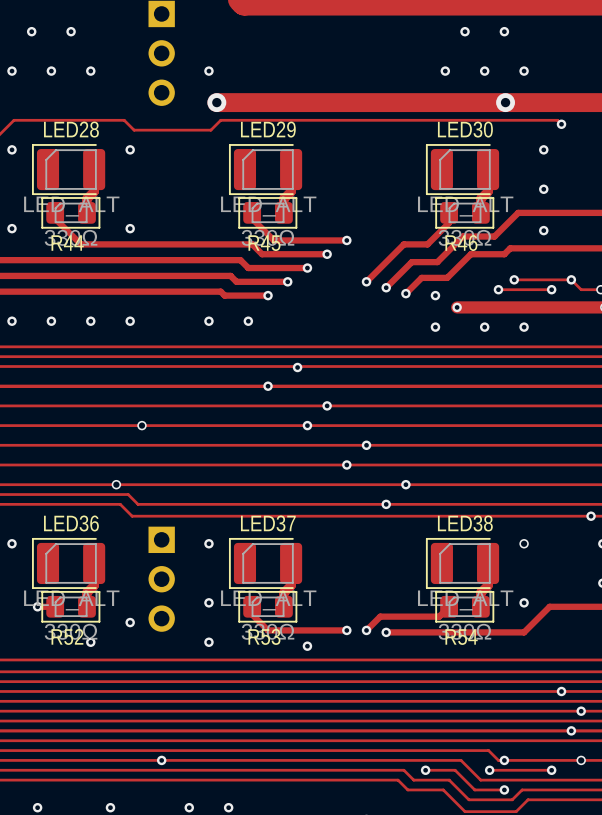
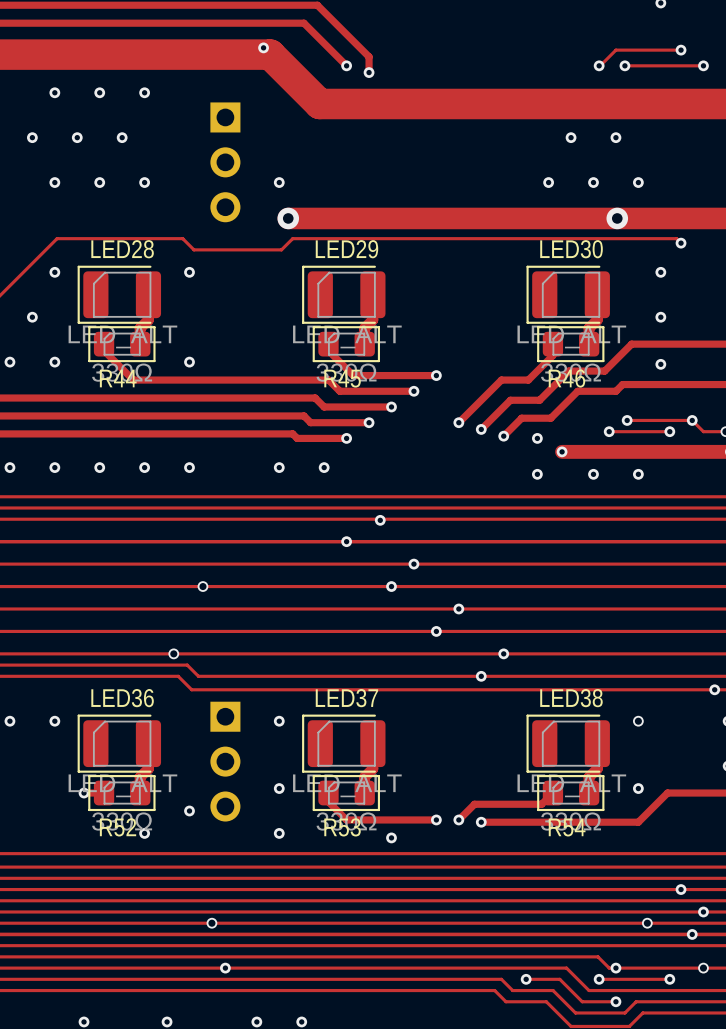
via: none -> (211, 923)
via: none -> (647, 923)

